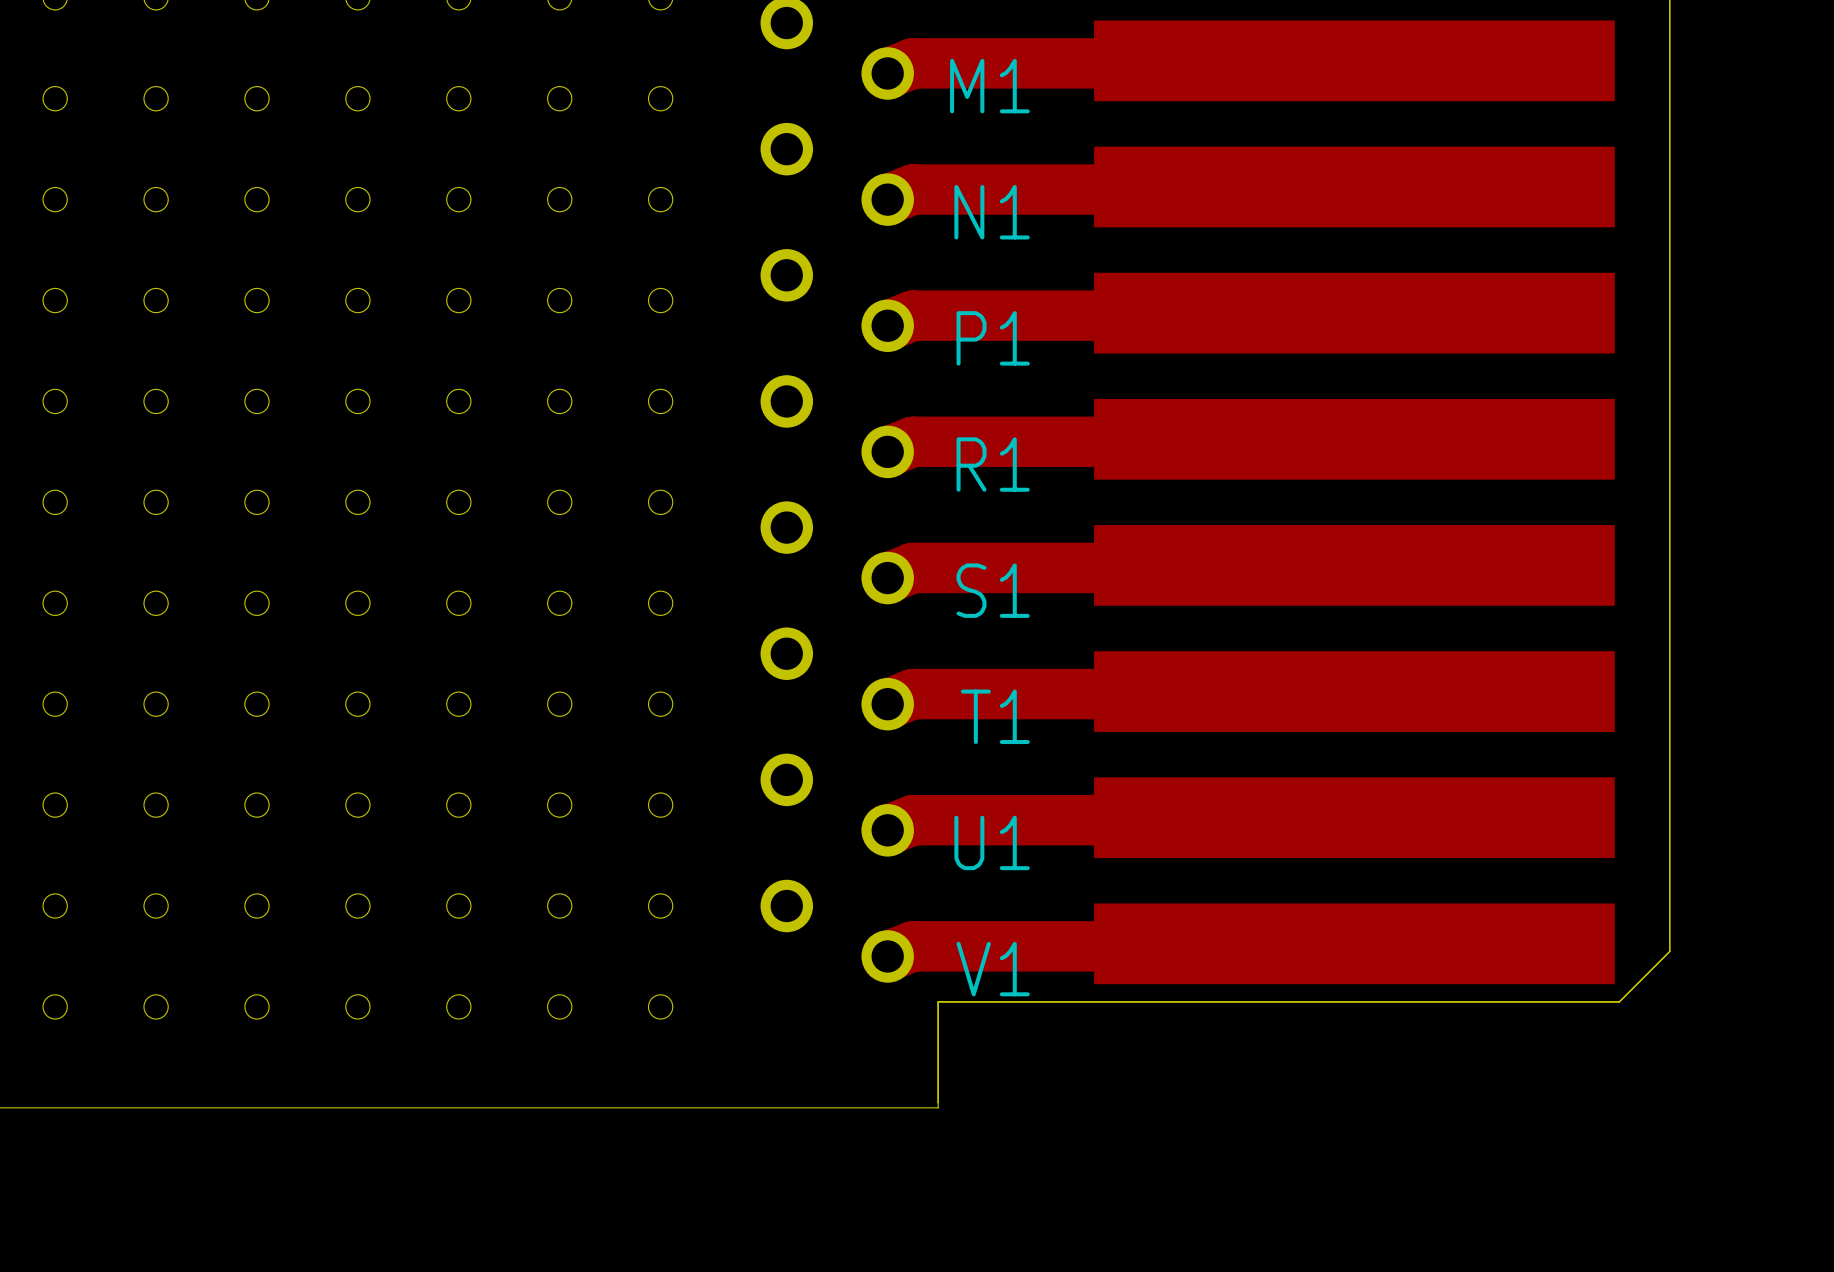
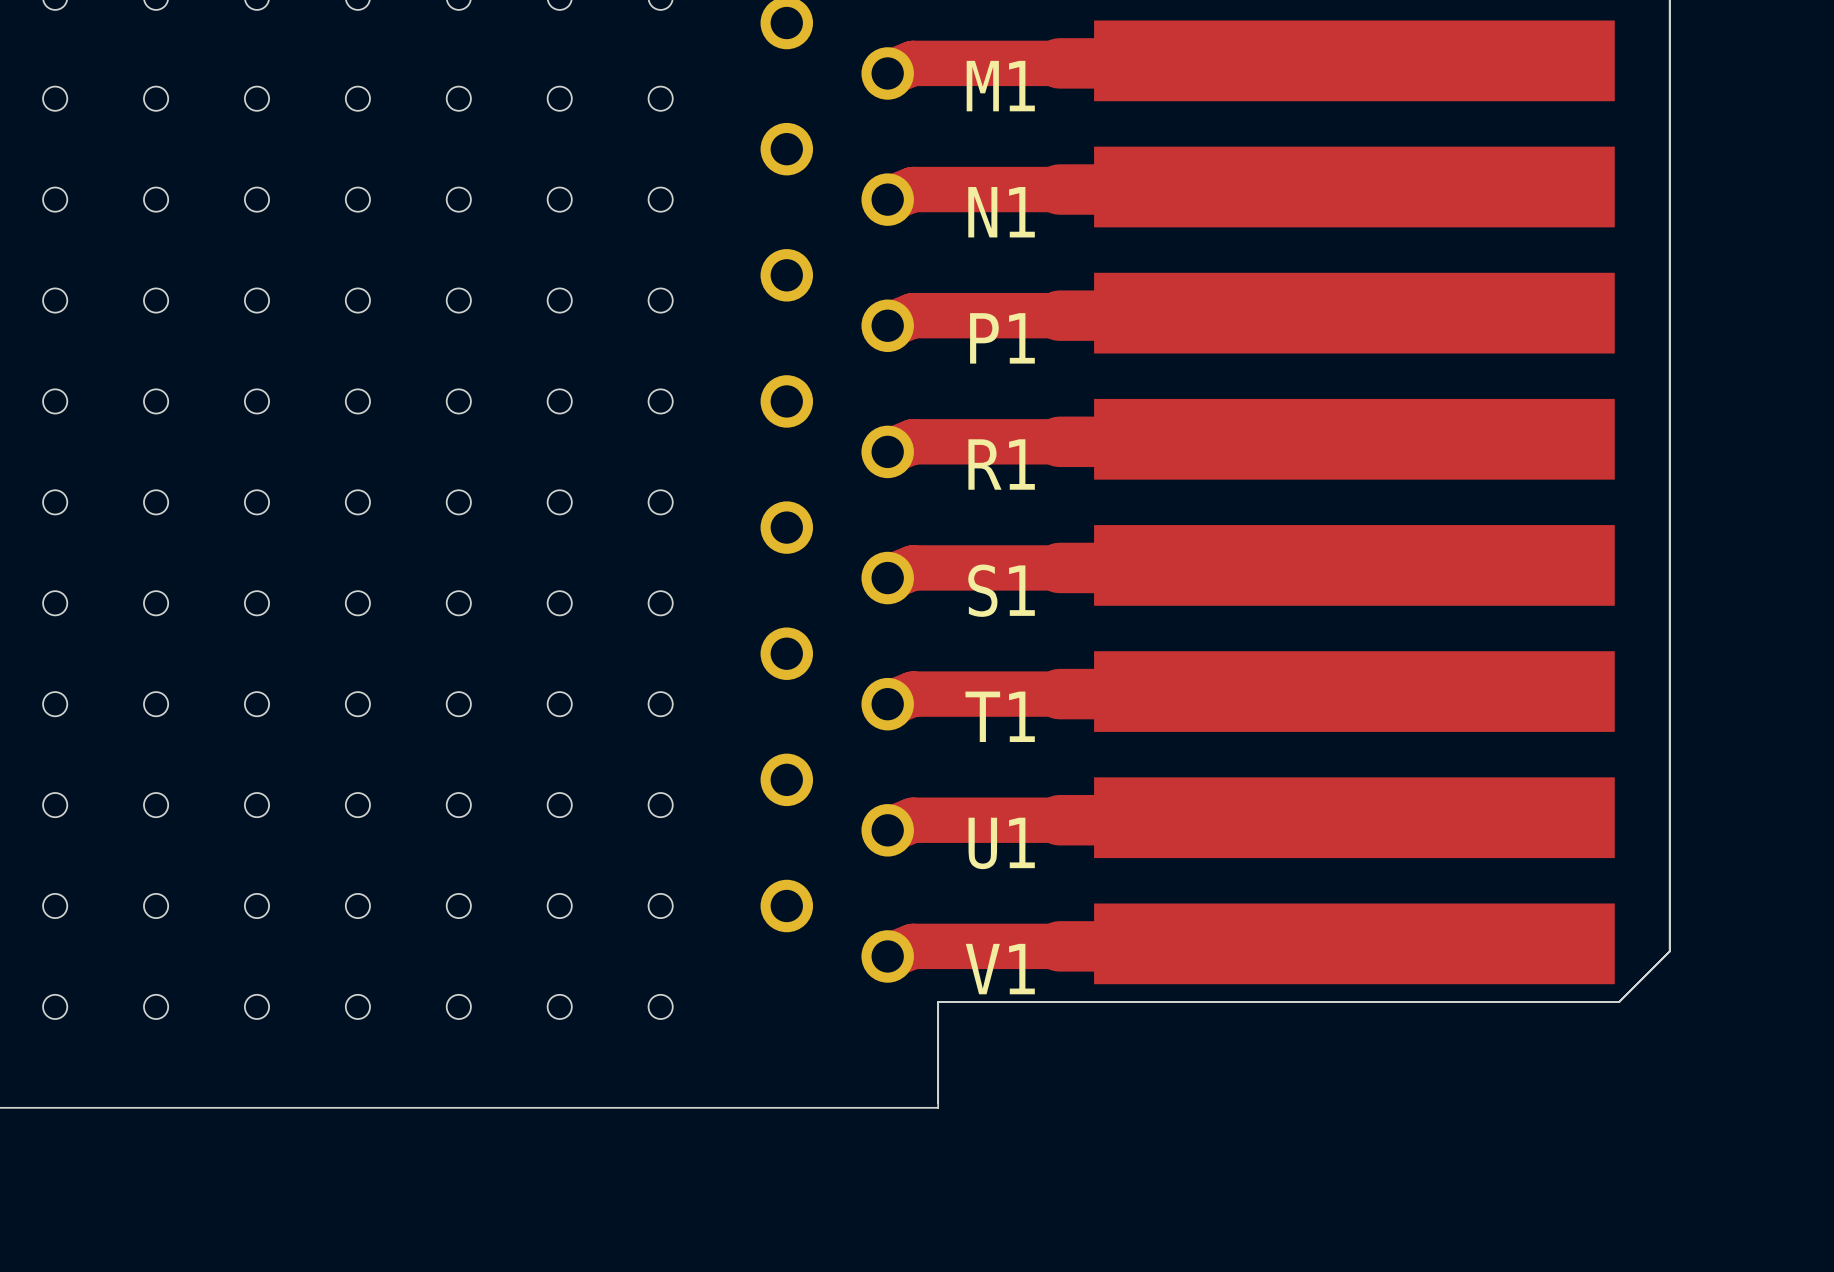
track width: thick (1059, 63) (912, 63) (887, 73) -> thin (1059, 63) (912, 63) (887, 73)
track width: thick (1059, 189) (912, 189) (887, 199) -> thin (1059, 189) (912, 189) (887, 199)
track width: thick (1059, 315) (912, 315) (887, 325) -> thin (1059, 315) (912, 315) (887, 325)
track width: thick (1059, 441) (912, 441) (887, 451) -> thin (1059, 441) (912, 441) (887, 451)
track width: thick (1059, 567) (912, 567) (887, 578) -> thin (1059, 567) (912, 567) (887, 578)
track width: thick (1059, 694) (912, 694) (887, 704) -> thin (1059, 694) (912, 694) (887, 704)
track width: thick (1059, 820) (912, 820) (887, 830) -> thin (1059, 820) (912, 820) (887, 830)
track width: thick (1059, 946) (912, 946) (887, 956) -> thin (1059, 946) (912, 946) (887, 956)

